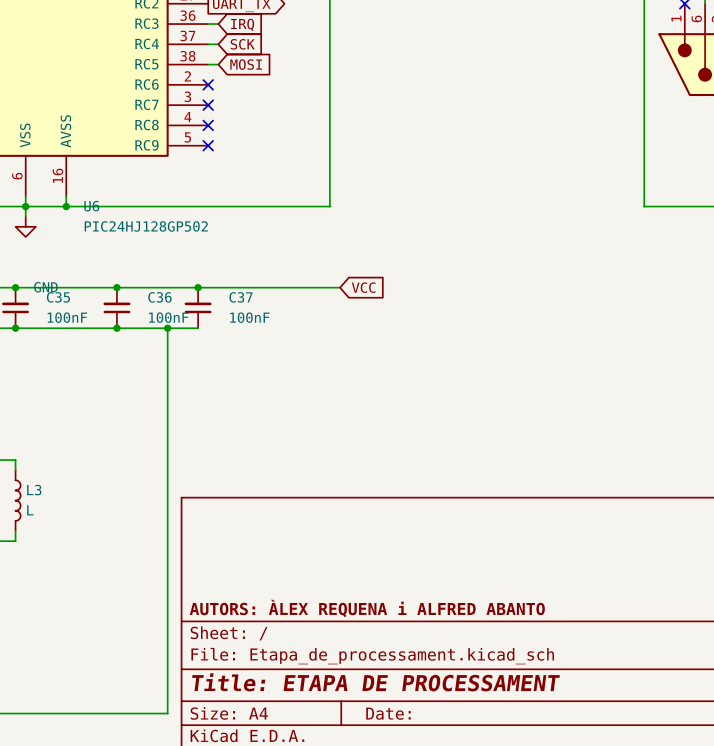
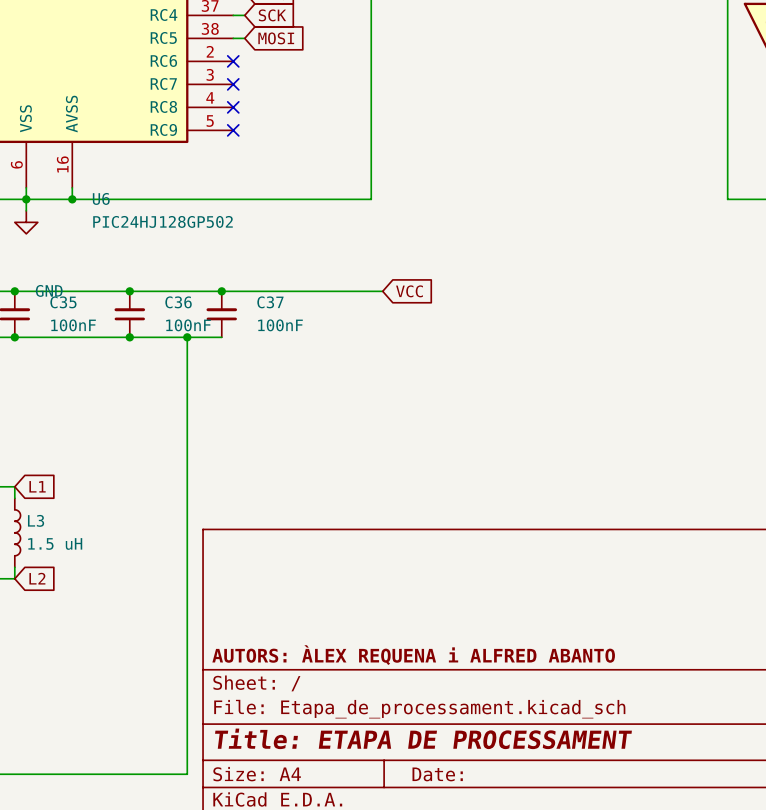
global label: none -> L1 (37, 486)
L3 value: L (30, 510) -> 1.5 uH (55, 543)
global label: none -> L2 (37, 578)

